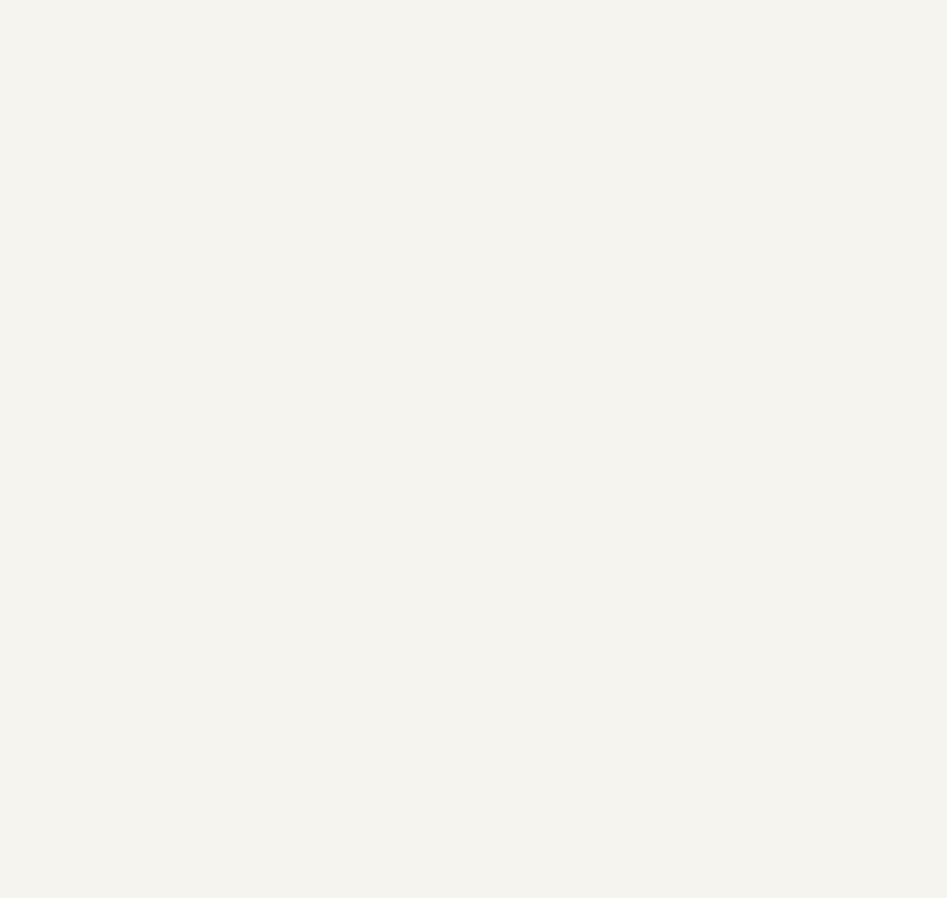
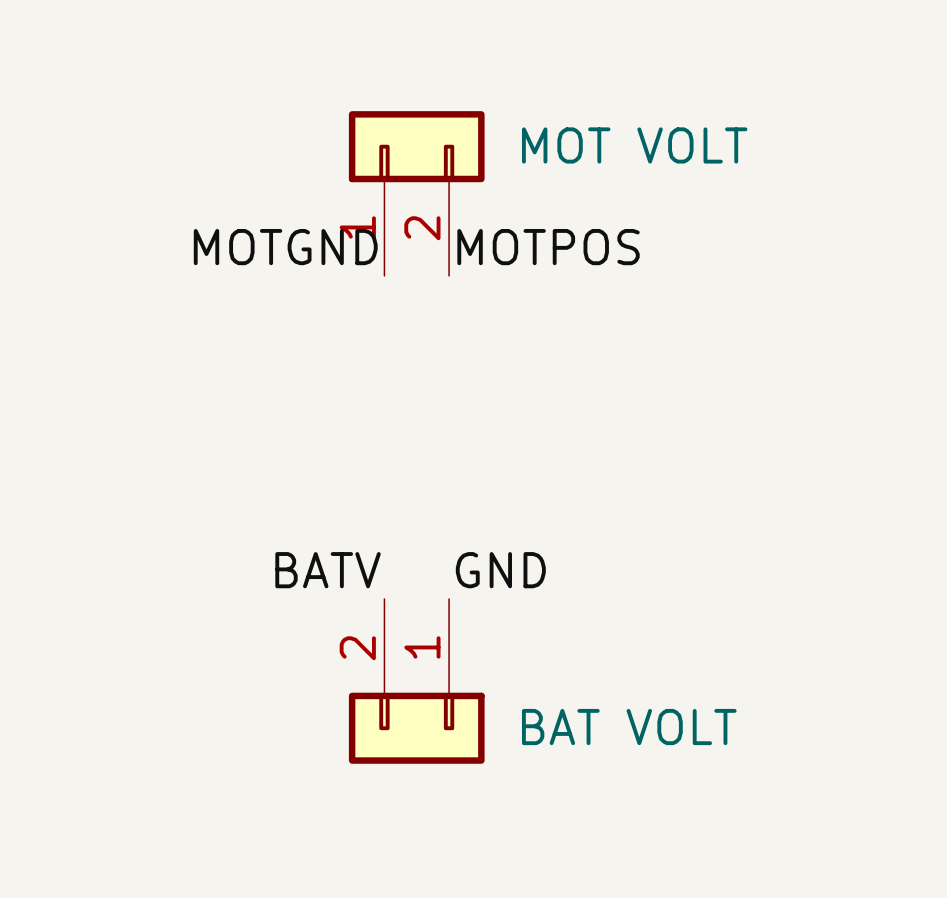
part: none -> MOT VOLT (416, 193)
label: none -> MOTGND (285, 247)
label: none -> MOTPOS (548, 247)
label: none -> BATV (328, 570)
label: none -> GND (500, 570)
part: none -> BAT VOLT (416, 681)

